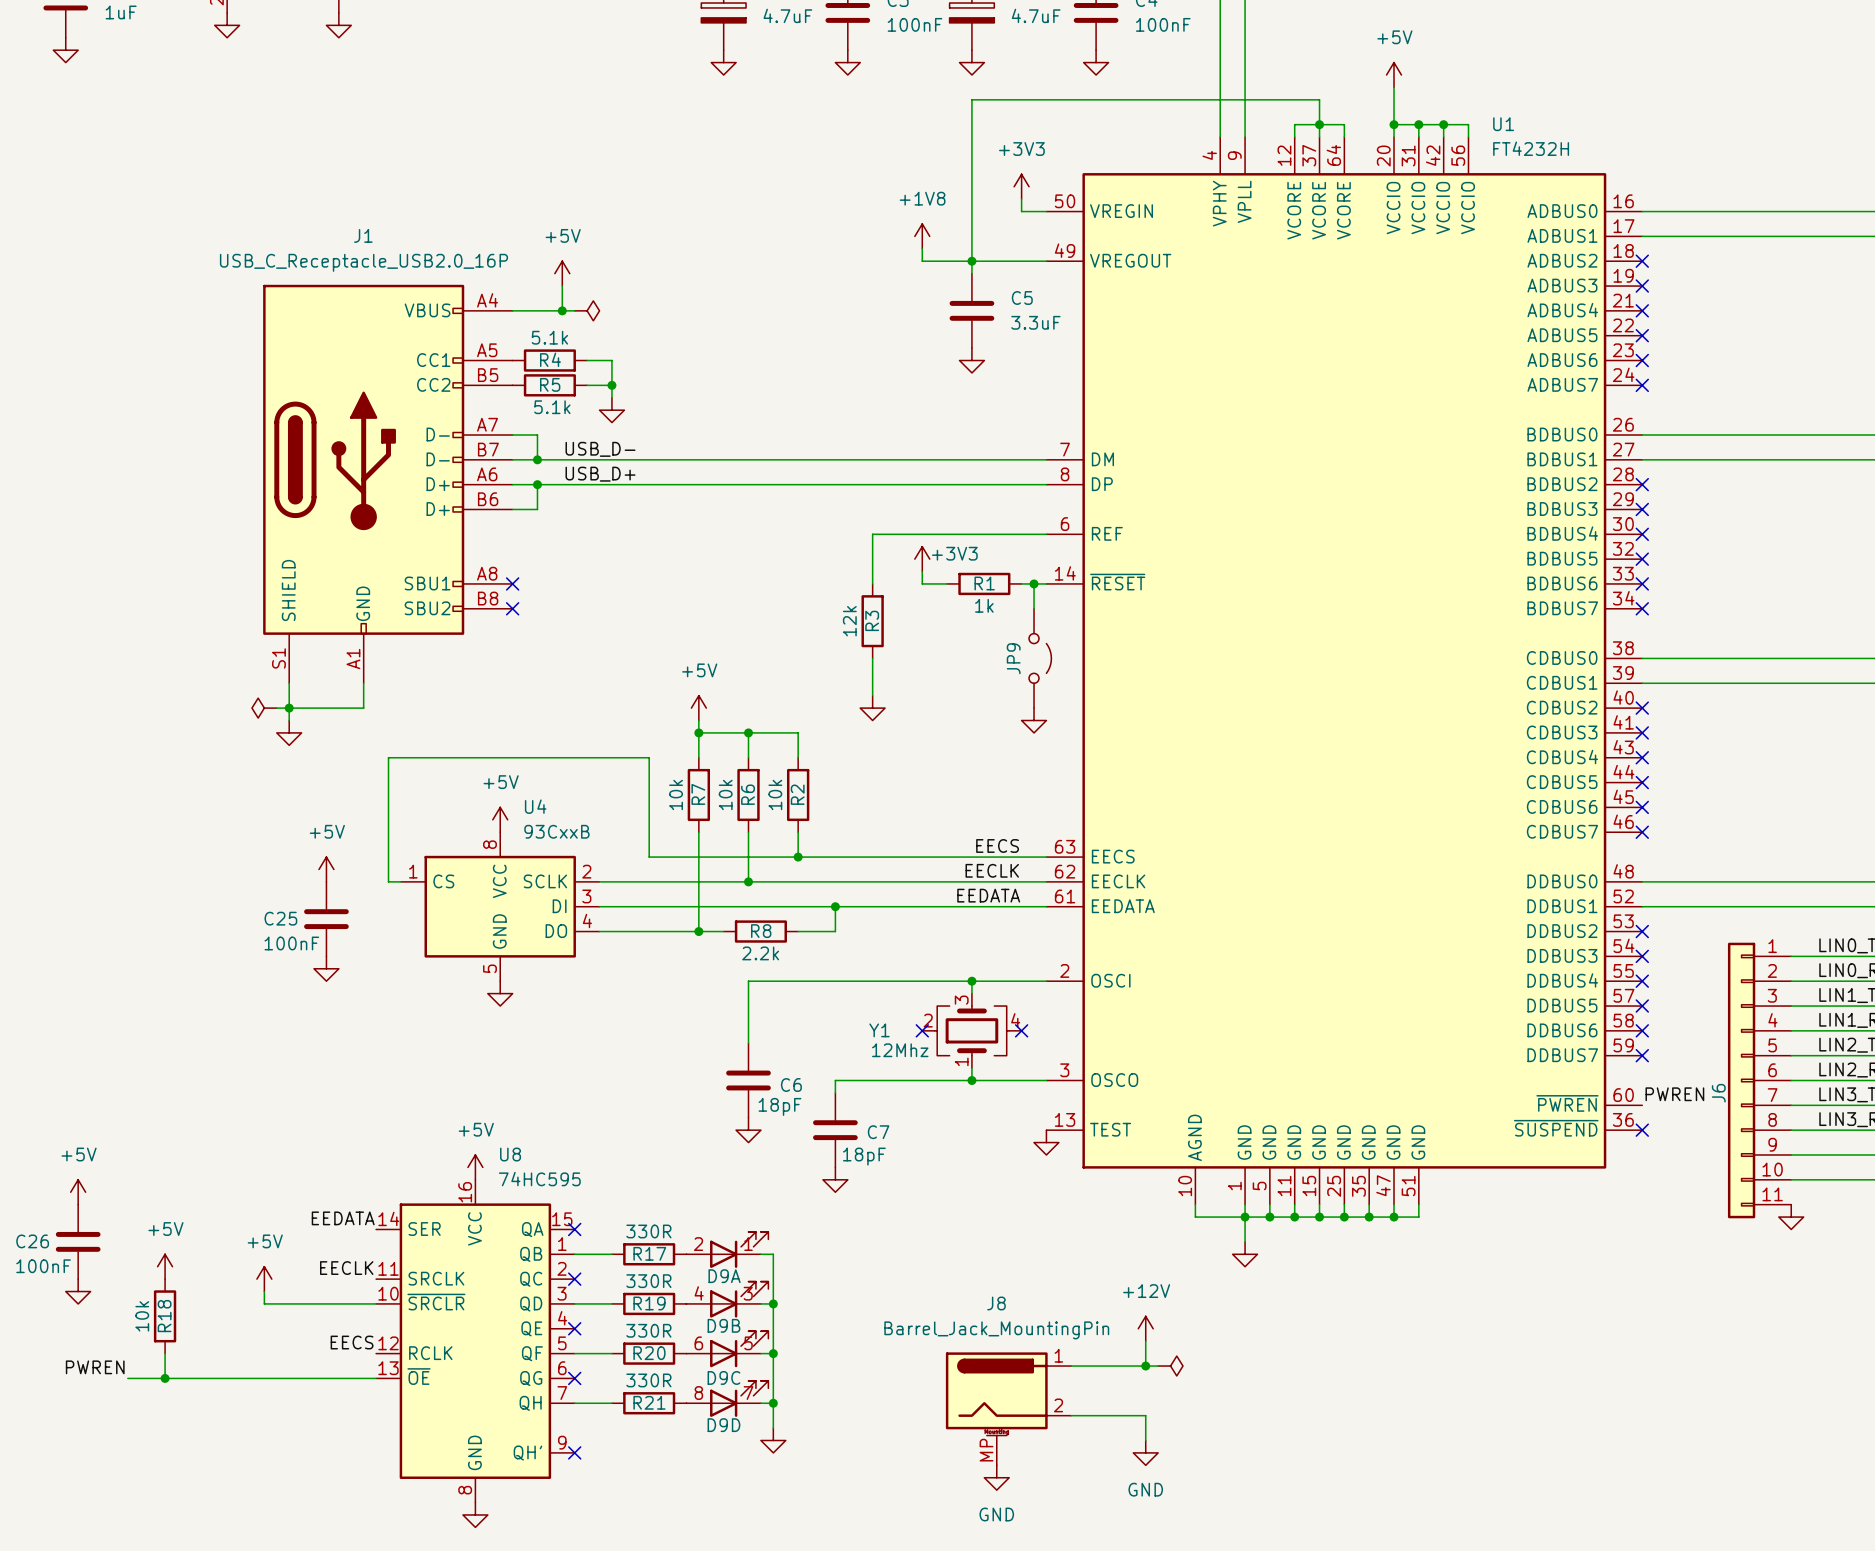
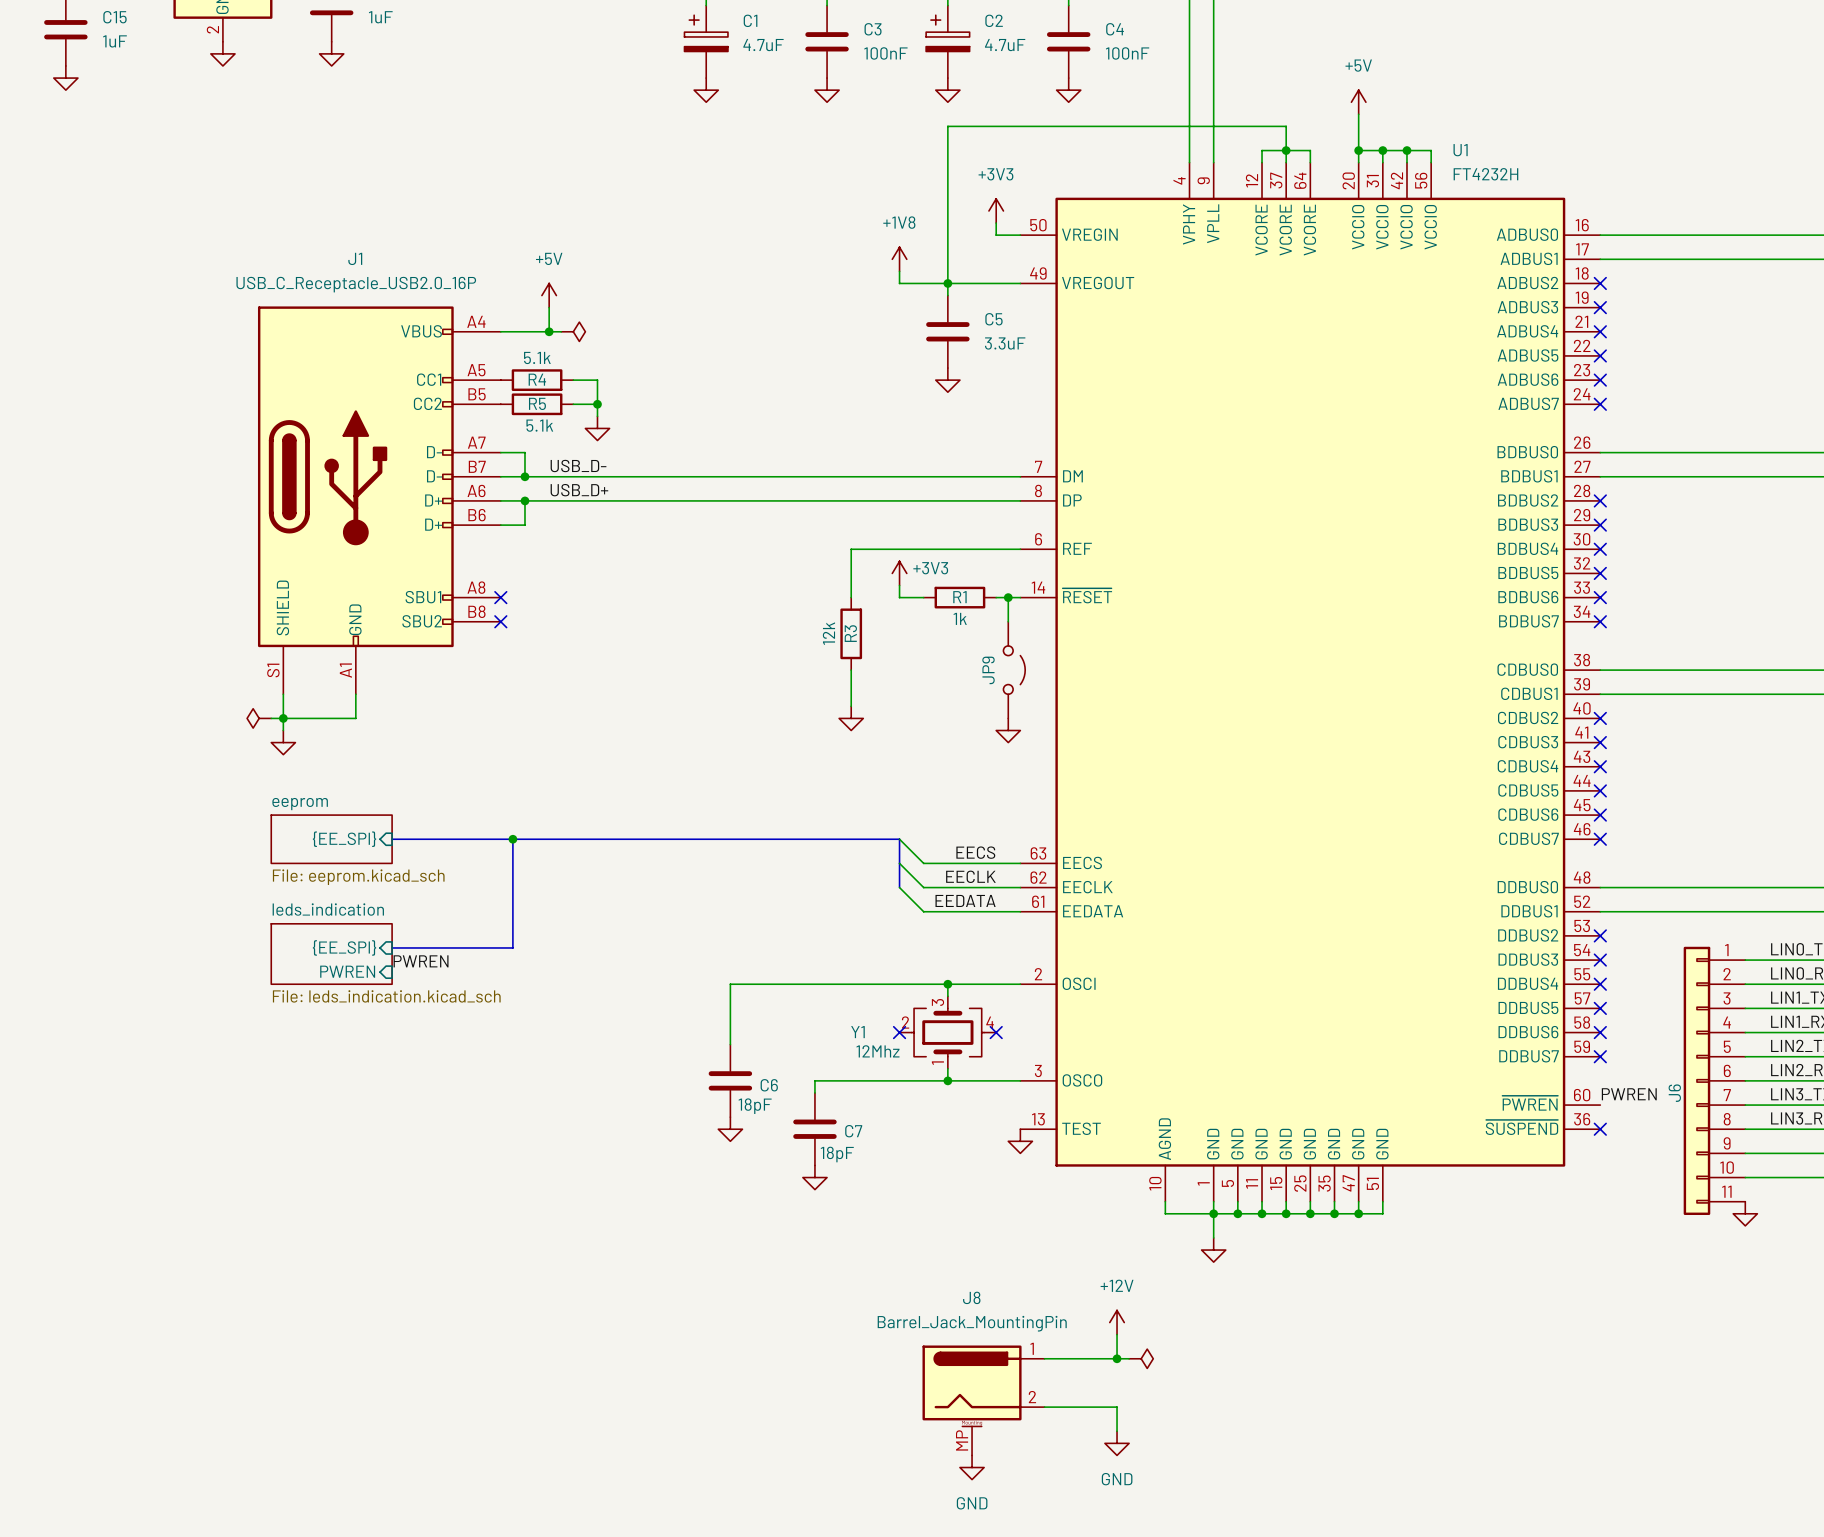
power symbol: +5V (698, 708) -> none
wire: (698, 720) (698, 757) -> none
wire: (698, 732) (798, 732) (798, 757) -> none
junction: (698, 732) -> none
wire: (748, 732) (748, 757) -> none
junction: (748, 732) -> none
R7: 10k (698, 794) -> none
R6: 10k (748, 794) -> none
R2: 10k (798, 794) -> none
power symbol: +5V (500, 819) -> none
sheet eeprom: none -> File: eeprom.kicad_sch (331, 839)
bus: none -> (392, 839) (899, 839) (899, 887)
bus: none -> (512, 839) (512, 947) (392, 947)
junction: none -> (512, 839)
wire: (698, 832) (698, 931) -> none
wire: (748, 832) (748, 881) -> none
wire: (798, 832) (798, 857) -> none
sheet pin: none -> {EE_SPI} (344, 839)
junction: (798, 857) -> none
wire: (947, 857) (649, 857) (649, 757) (388, 757) (388, 881) (400, 881) -> (923, 863) (899, 839)
power symbol: +5V (326, 869) -> none
wire: (599, 881) (947, 881) -> (899, 863) (923, 887)
junction: (748, 881) -> none
U4: 93CxxB (500, 906) -> none
wire: (599, 906) (947, 906) -> (899, 887) (923, 911)
wire: (835, 906) (835, 931) (798, 931) -> none
junction: (835, 906) -> none
C25: 100nF (326, 919) -> none
wire: (599, 931) (723, 931) -> none
junction: (698, 931) -> none
R8: 2.2k (760, 931) -> none
sheet pin: none -> {EE_SPI} (344, 947)
sheet leds_indication: none -> File: leds_indication.kicad_sch (331, 954)
label: none -> PWREN (421, 961)
power symbol: (326, 968) -> none
sheet pin: none -> PWREN (347, 971)
power symbol: (500, 993) -> none
power symbol: +5V (475, 1167) -> none
power symbol: +5V (78, 1192) -> none
label: EEDATA (343, 1218) -> none
no-connect mark: (574, 1229) -> none
C26: 100nF (78, 1241) -> none
D9A: (727, 1249) -> none
wire: (574, 1254) (611, 1254) -> none
R17: 330R (649, 1254) -> none
wire: (760, 1254) (773, 1254) (773, 1428) -> none
power symbol: +5V (165, 1266) -> none
label: EECLK (346, 1268) -> none
power symbol: +5V (264, 1279) -> none
no-connect mark: (574, 1279) -> none
power symbol: (78, 1291) -> none
wire: (264, 1291) (264, 1303) (376, 1303) -> none
D9B: (727, 1299) -> none
wire: (574, 1303) (611, 1303) -> none
R19: 330R (649, 1303) -> none
wire: (760, 1303) (773, 1303) -> none
junction: (773, 1303) -> none
R18: 10k (165, 1316) -> none
no-connect mark: (574, 1328) -> none
U8: 74HC595 (475, 1341) -> none
label: EECS (352, 1342) -> none
D9C: (727, 1349) -> none
wire: (165, 1353) (165, 1378) -> none
wire: (574, 1353) (611, 1353) -> none
R20: 330R (649, 1353) -> none
wire: (760, 1353) (773, 1353) -> none
junction: (773, 1353) -> none
label: PWREN (95, 1367) -> none
wire: (127, 1378) (376, 1378) -> none
junction: (165, 1378) -> none
no-connect mark: (574, 1378) -> none
D9D: (727, 1398) -> none
wire: (574, 1403) (611, 1403) -> none
R21: 330R (649, 1403) -> none
wire: (760, 1403) (773, 1403) -> none
junction: (773, 1403) -> none
power symbol: (773, 1440) -> none
no-connect mark: (574, 1452) -> none
power symbol: (475, 1514) -> none

